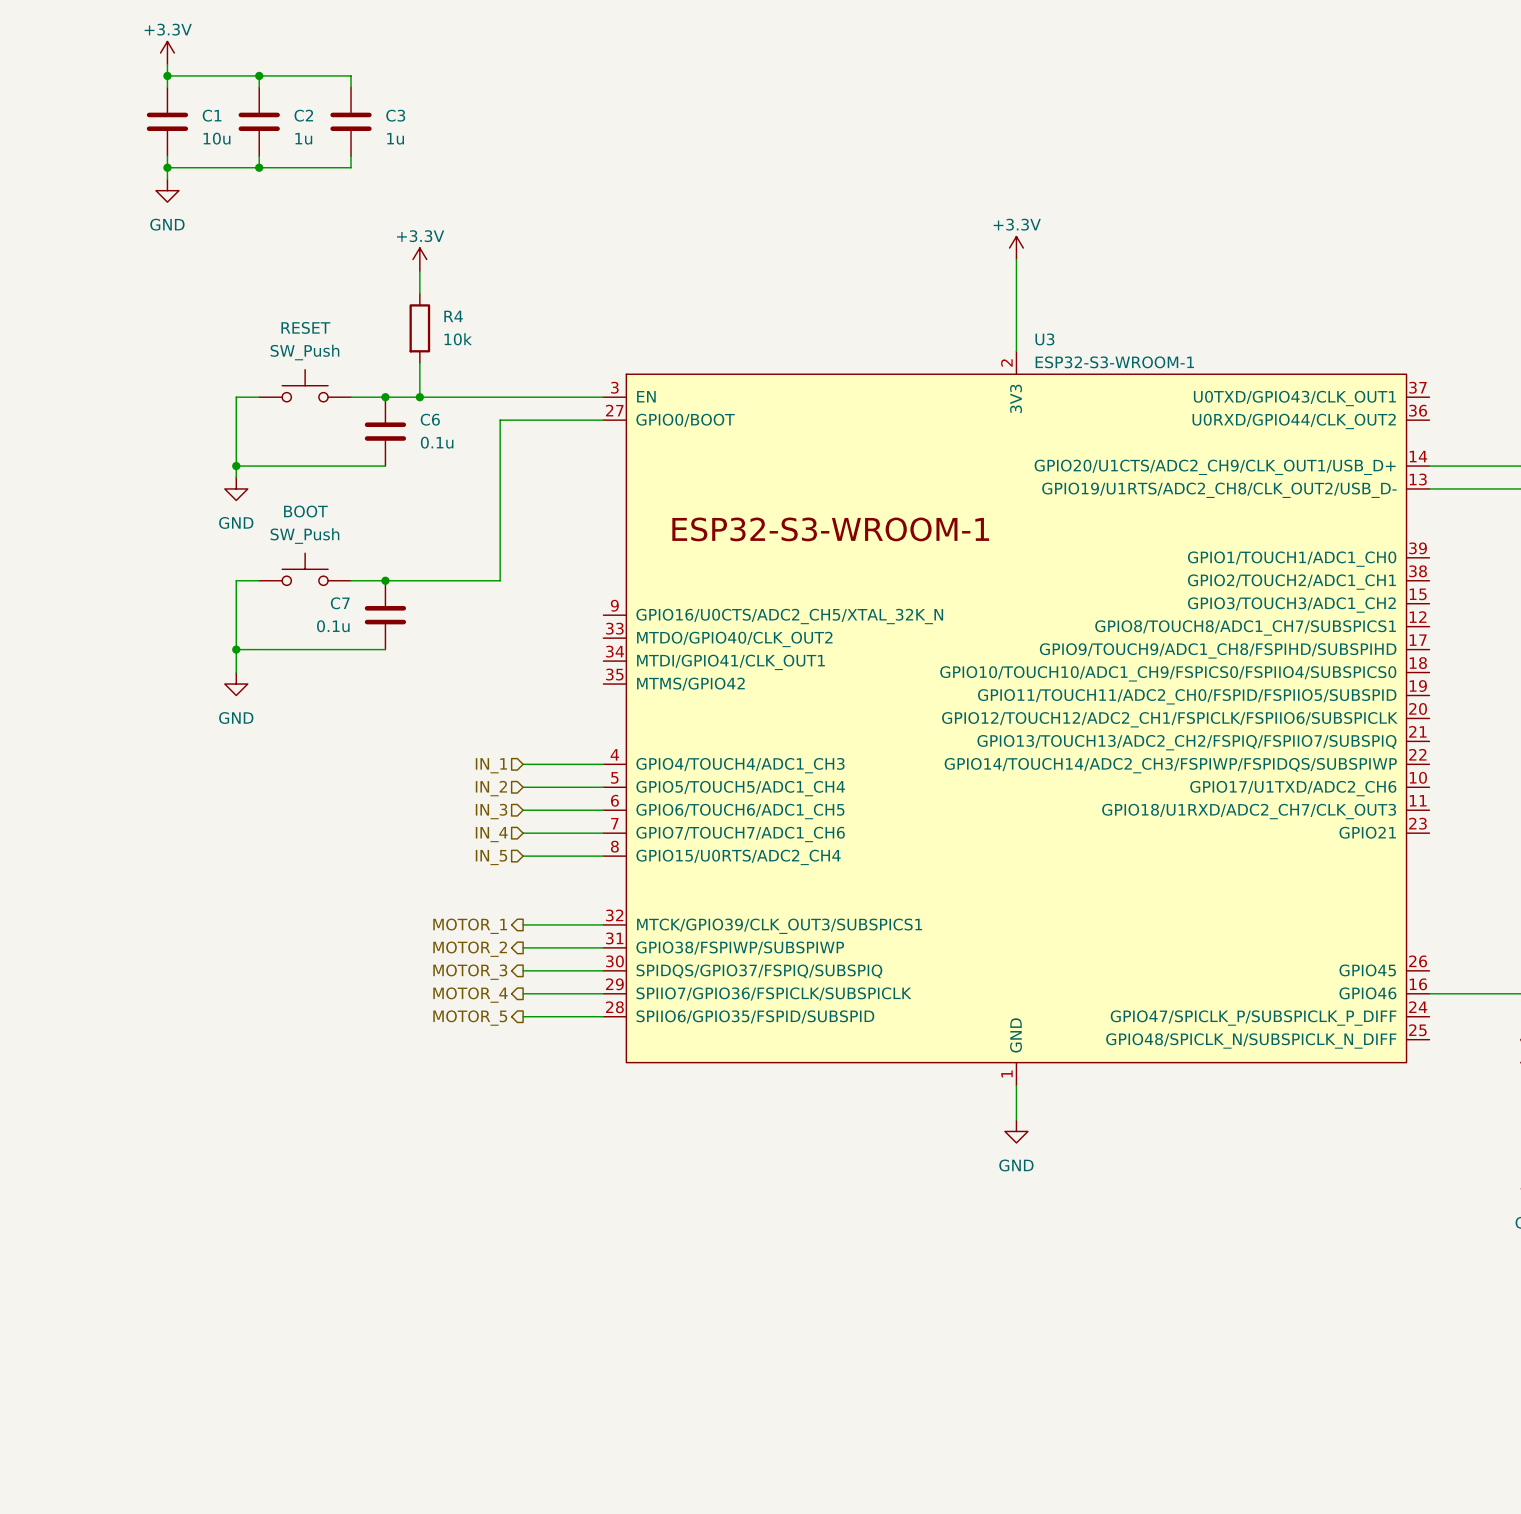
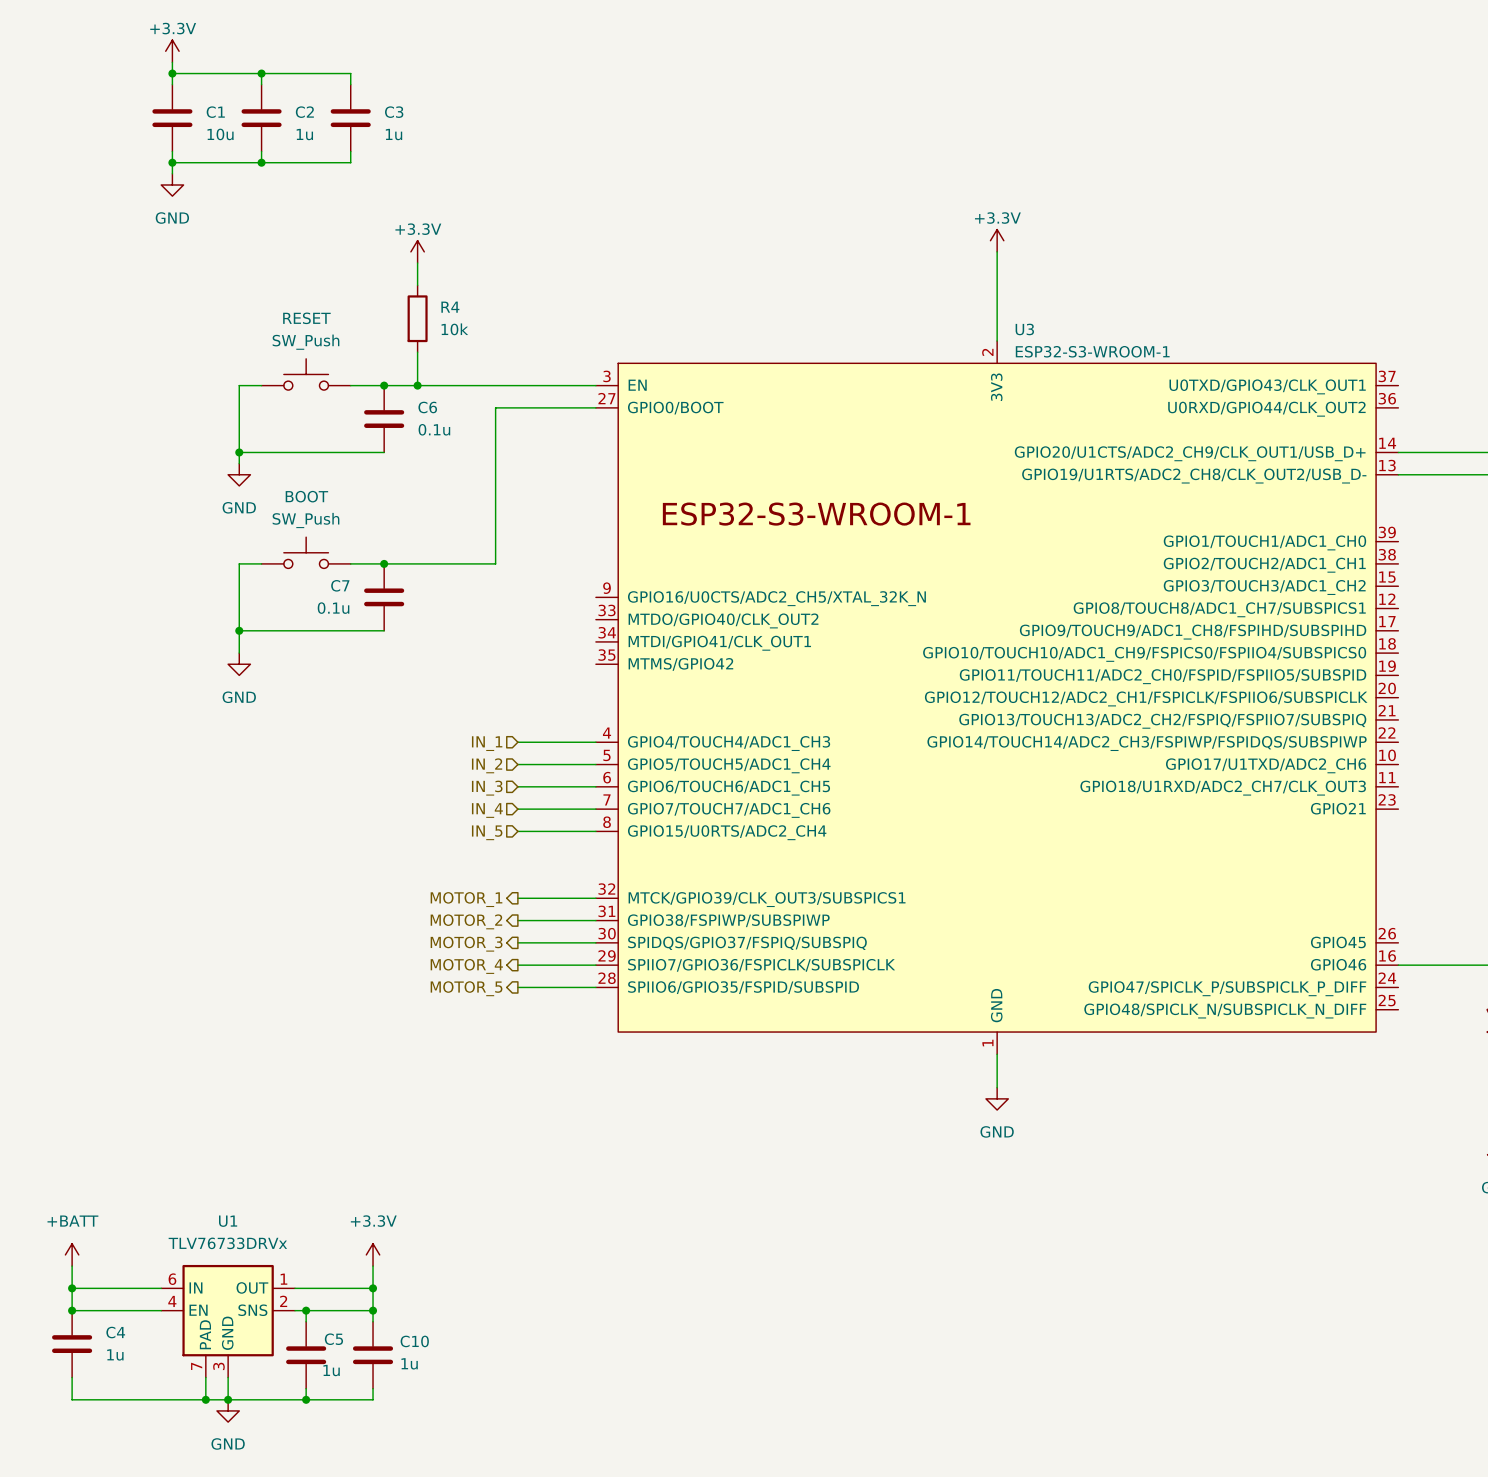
power symbol: none -> +BATT (72, 1254)
power symbol: none -> +3.3V (373, 1254)
wire: none -> (72, 1266) (72, 1310) (161, 1310)
wire: none -> (373, 1266) (373, 1321)
wire: none -> (72, 1288) (161, 1288)
junction: none -> (72, 1288)
wire: none -> (295, 1288) (373, 1288)
junction: none -> (373, 1288)
junction: none -> (72, 1310)
wire: none -> (295, 1310) (373, 1310)
wire: none -> (306, 1310) (306, 1321)
junction: none -> (306, 1310)
junction: none -> (373, 1310)
U1: none -> TLV76733DRVx (228, 1321)
C4: none -> 1u (72, 1344)
C5: none -> 1u (306, 1355)
C10: none -> 1u (373, 1355)
wire: none -> (72, 1377) (72, 1399) (373, 1399) (373, 1388)
wire: none -> (205, 1377) (205, 1399)
wire: none -> (228, 1377) (228, 1399)
wire: none -> (306, 1388) (306, 1399)
junction: none -> (205, 1399)
junction: none -> (228, 1399)
junction: none -> (306, 1399)
power symbol: none -> GND (228, 1410)

